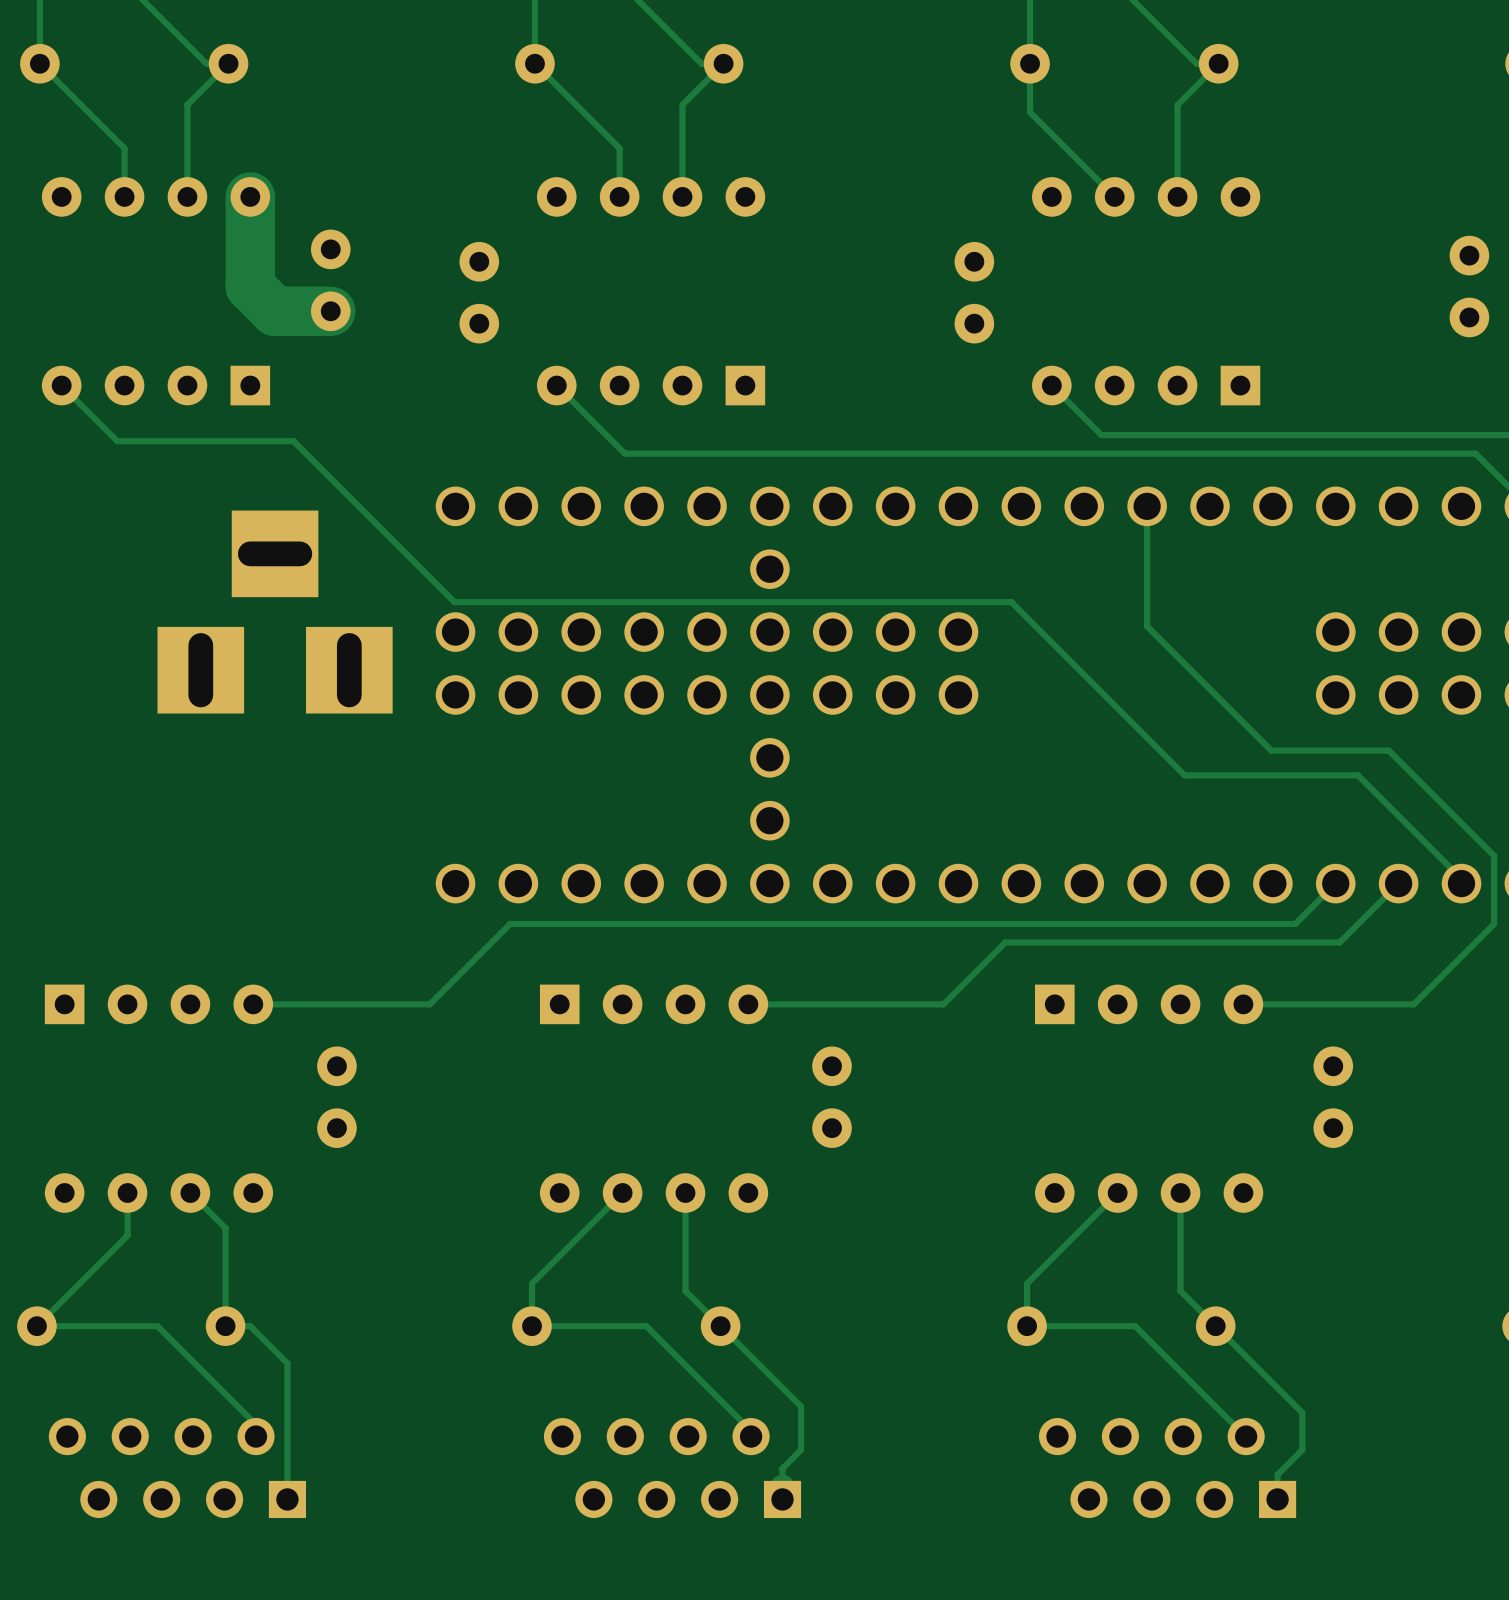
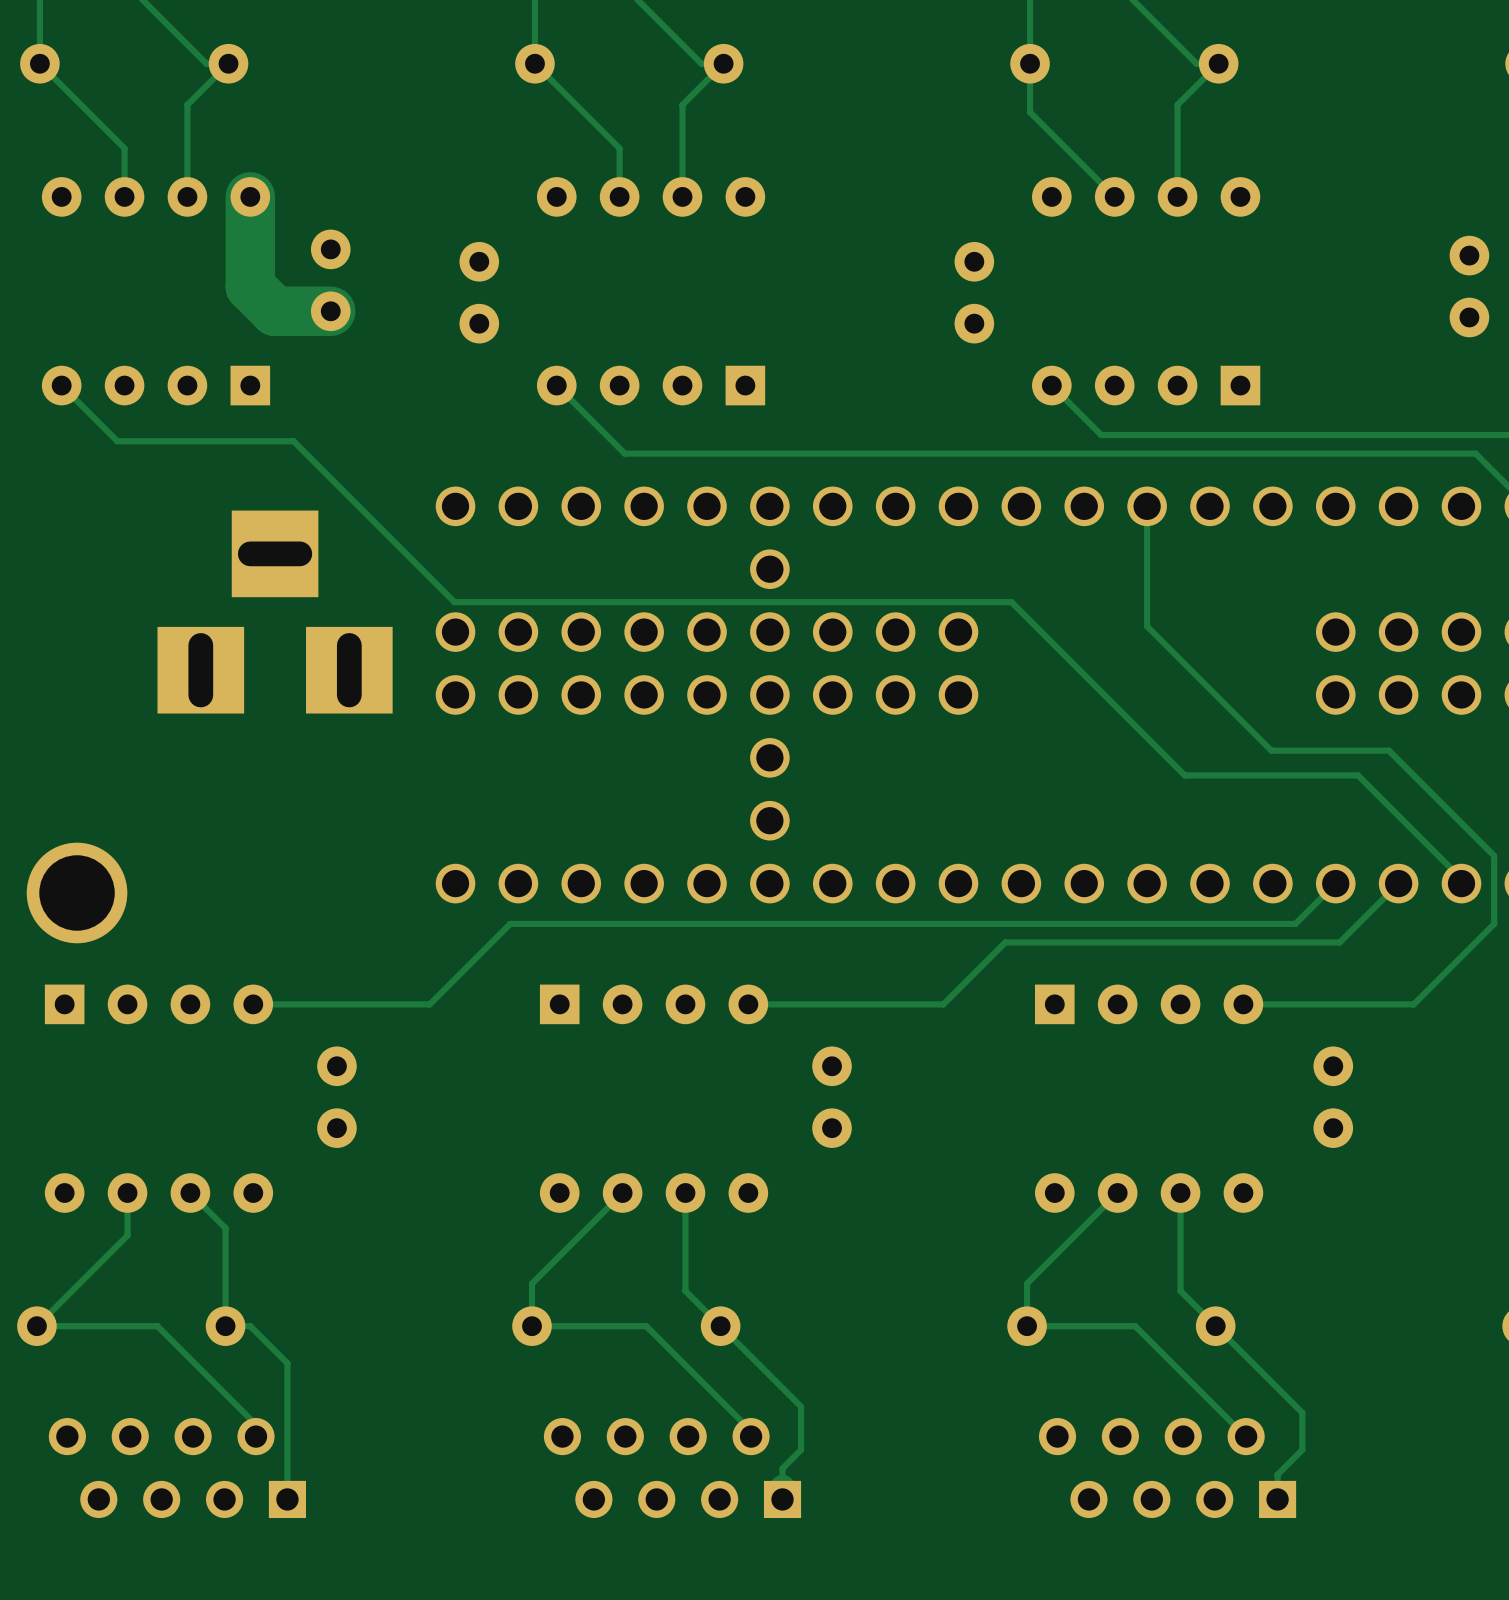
part: none -> (77, 892)

